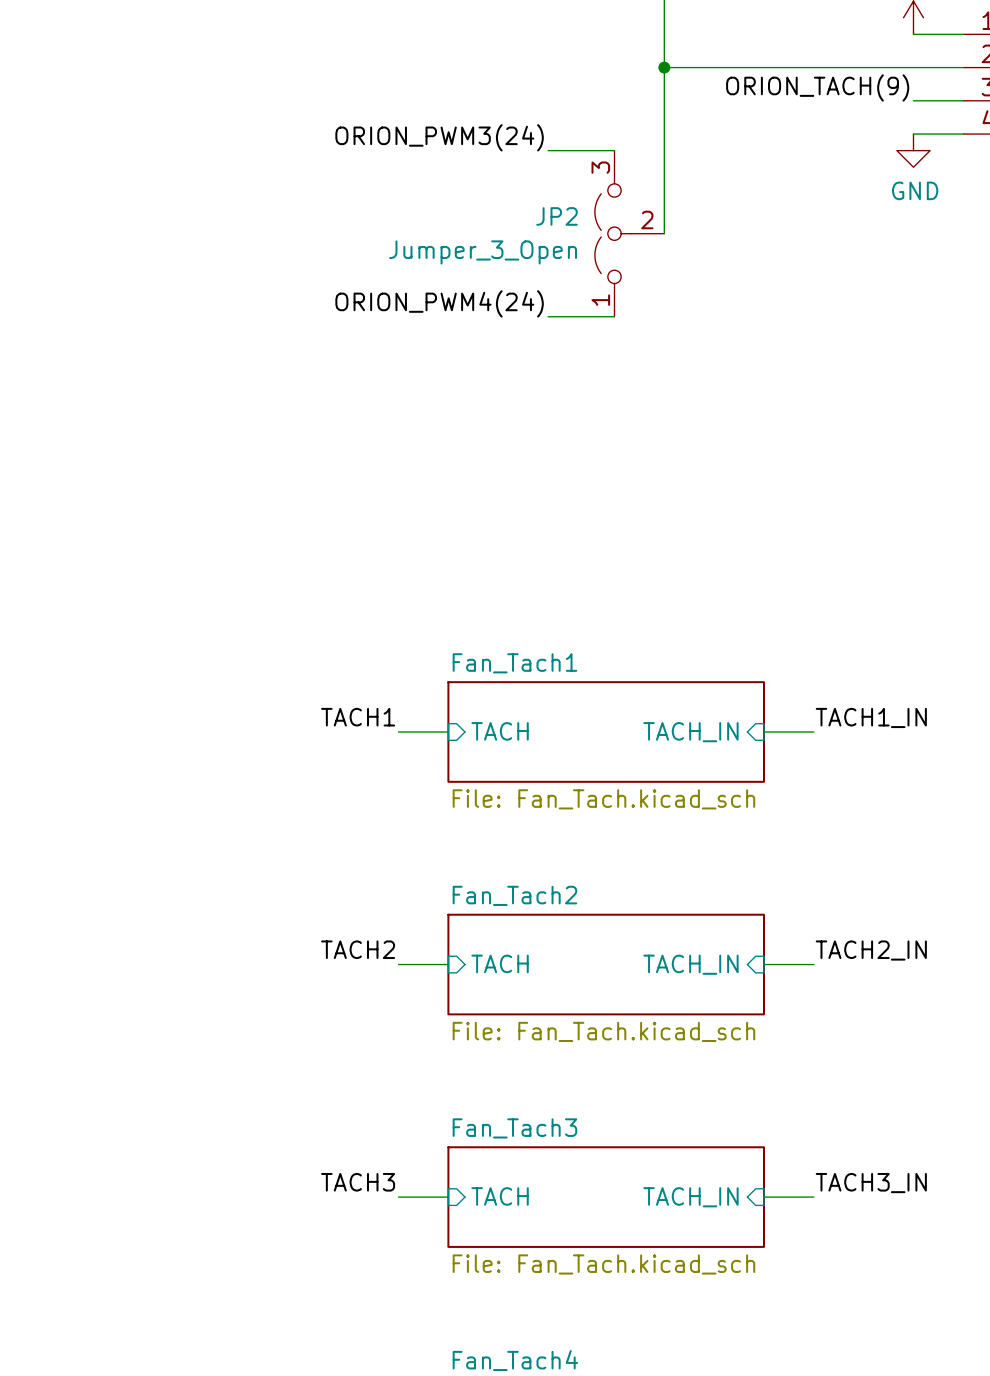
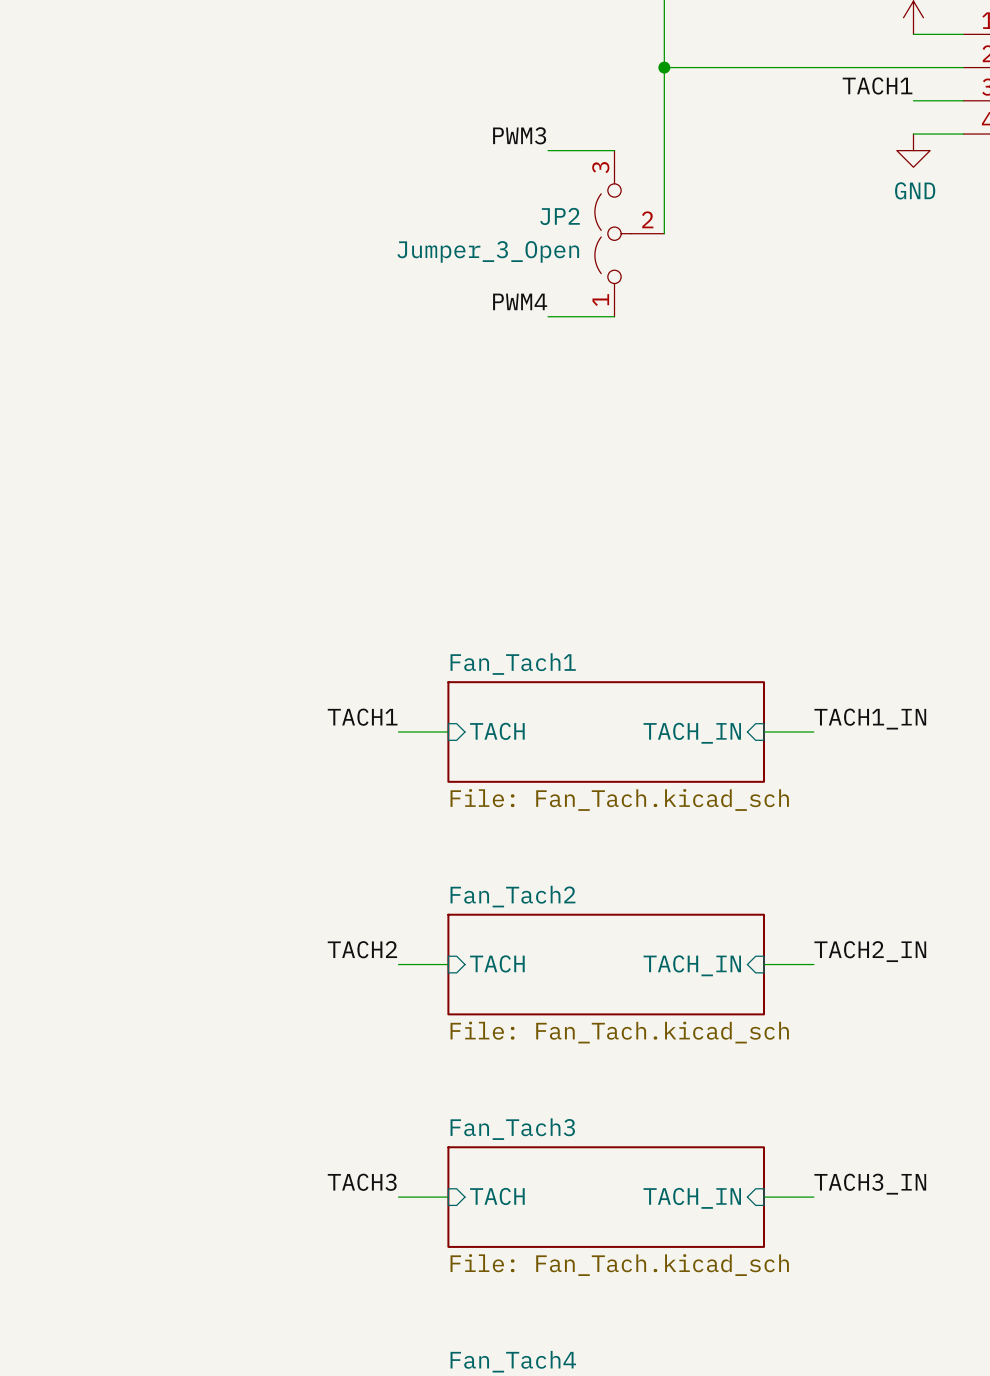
label: ORION_TACH(9) (817, 87) -> TACH1 (877, 85)
label: ORION_PWM3(24) (439, 137) -> PWM3 (519, 135)
label: ORION_PWM4(24) (439, 303) -> PWM4 (520, 301)

